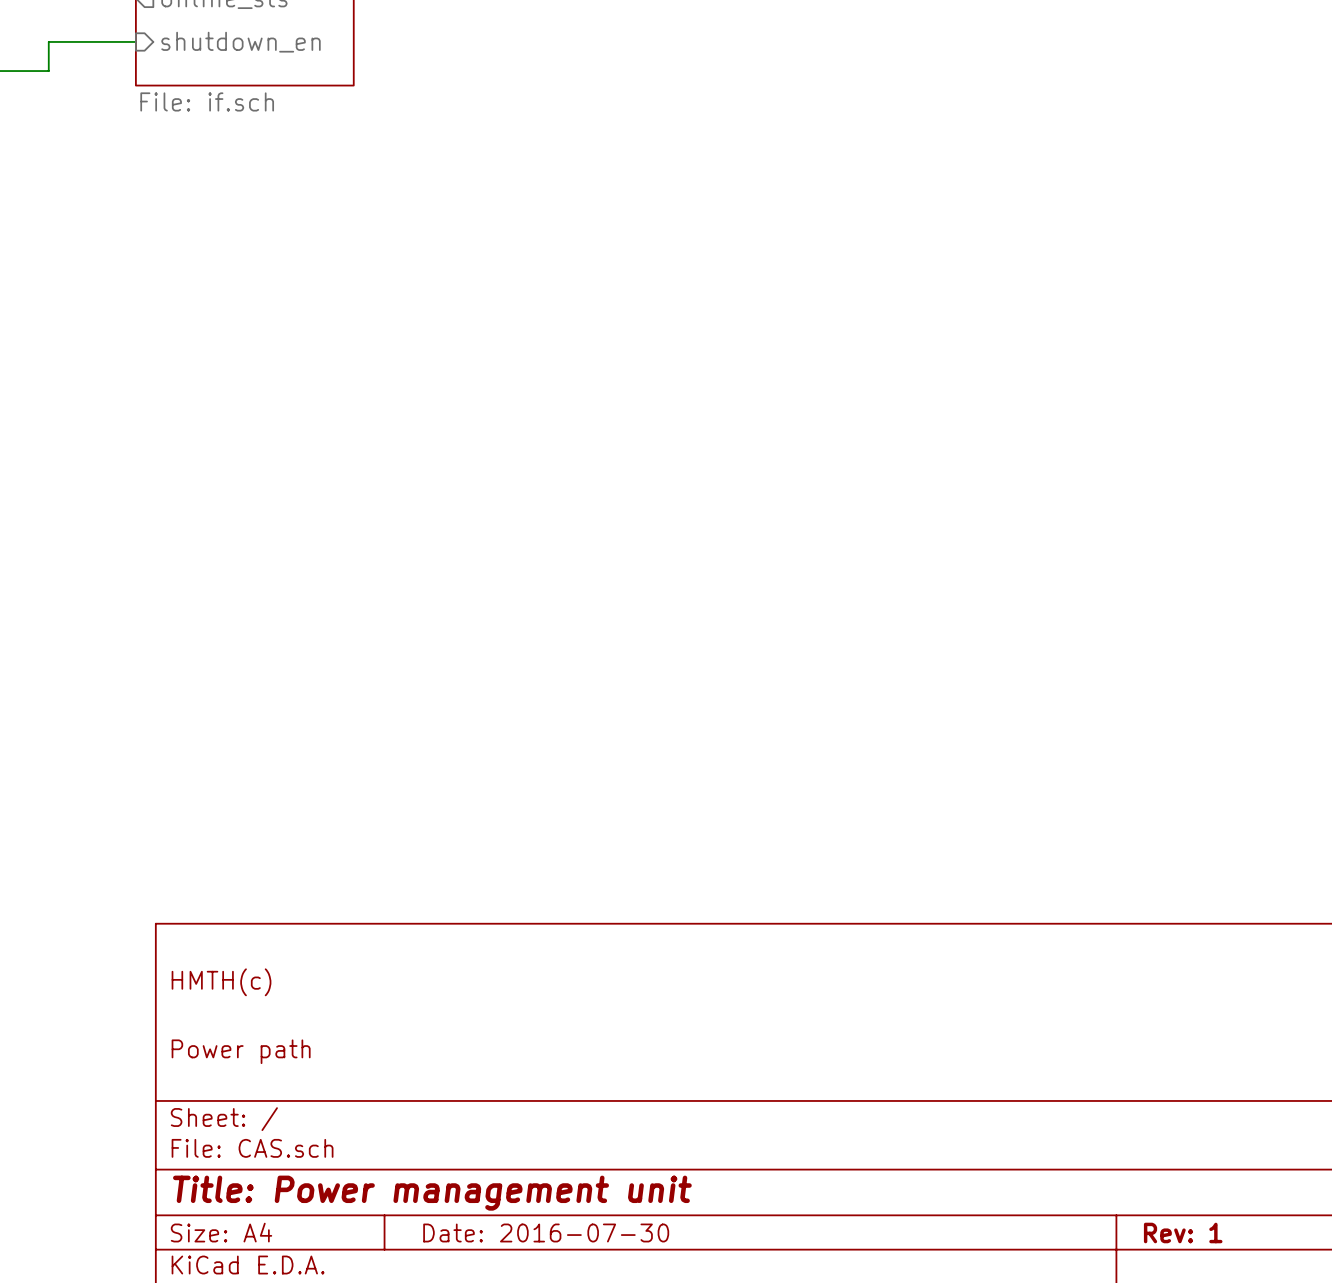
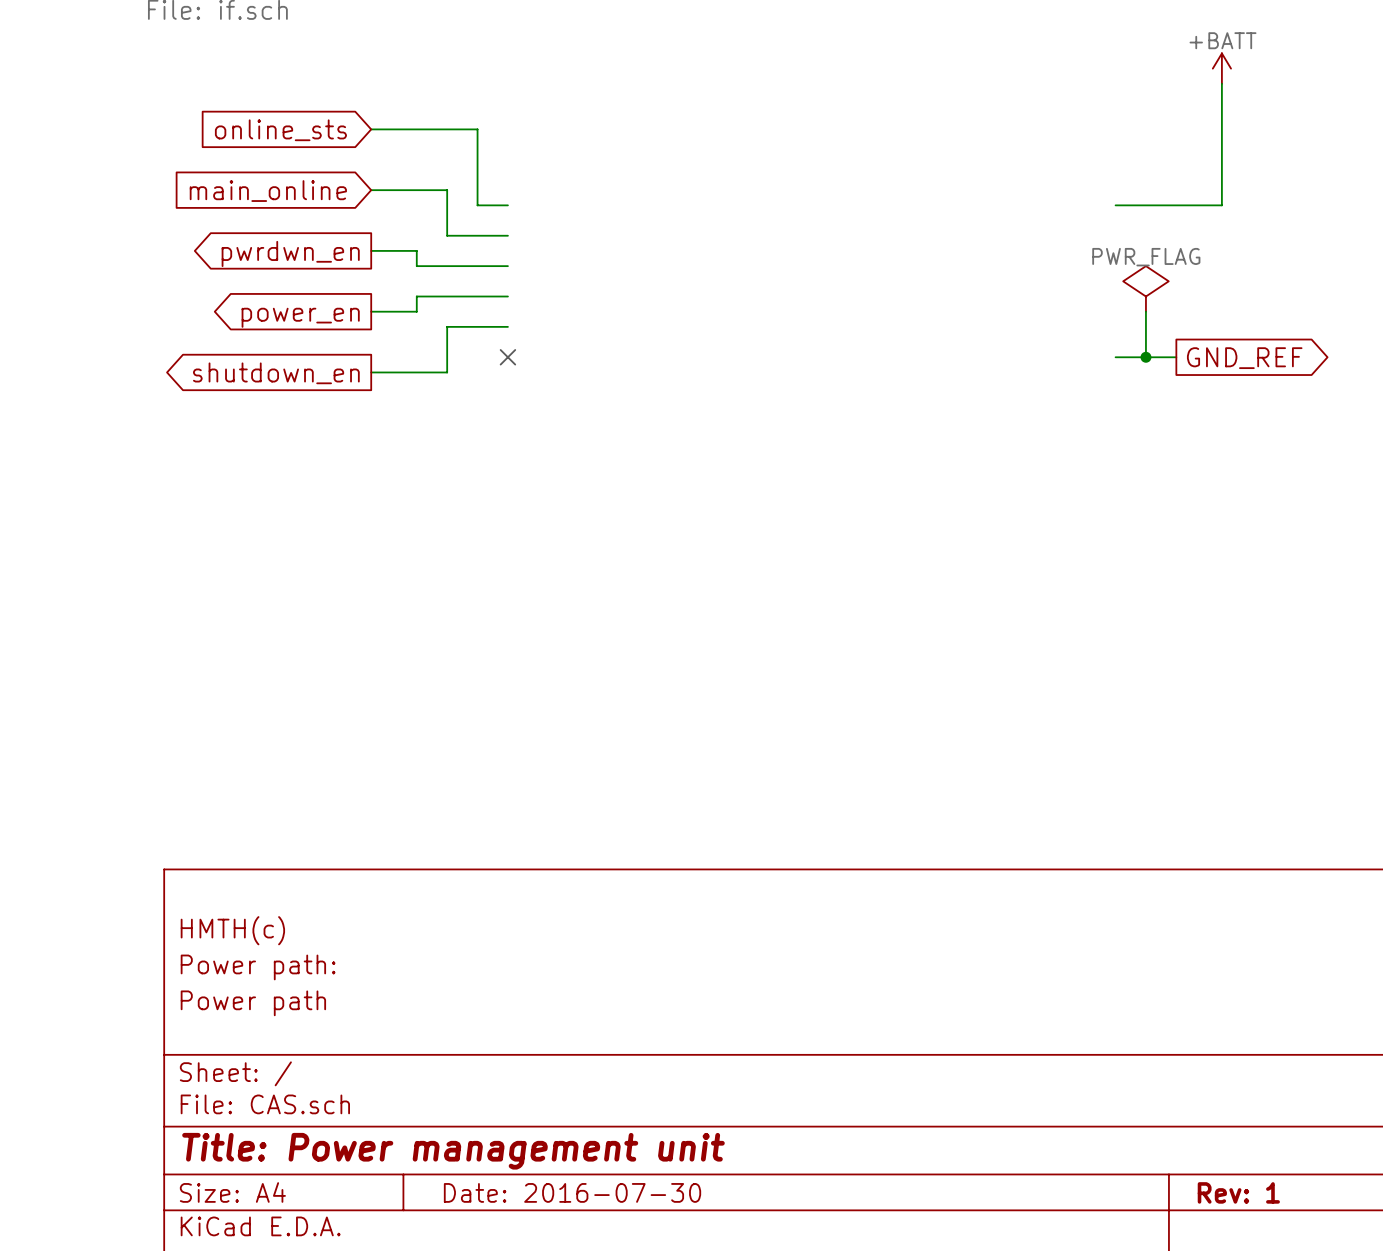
power symbol: none -> +BATT (1221, 68)
wire: none -> (1221, 83) (1221, 205) (1115, 205)
wire: none -> (371, 129) (477, 129) (477, 205) (507, 205)
global label: none -> online_sts (280, 130)
wire: none -> (371, 190) (447, 190) (447, 235) (507, 235)
global label: none -> main_online (268, 191)
wire: none -> (371, 250) (416, 250) (416, 266) (507, 266)
global label: none -> pwrdwn_en (290, 253)
power symbol: none -> PWR_FLAG (1145, 288)
wire: none -> (507, 296) (416, 296) (416, 311) (371, 311)
wire: none -> (1145, 311) (1145, 357)
global label: none -> power_en (300, 317)
wire: none -> (507, 326) (447, 326) (447, 372) (371, 372)
no-connect mark: none -> (507, 357)
wire: none -> (1115, 357) (1176, 357)
junction: none -> (1145, 357)
global label: none -> GND_REF (1244, 358)
global label: none -> shutdown_en (276, 373)
title block: none -> Power path: (258, 967)

